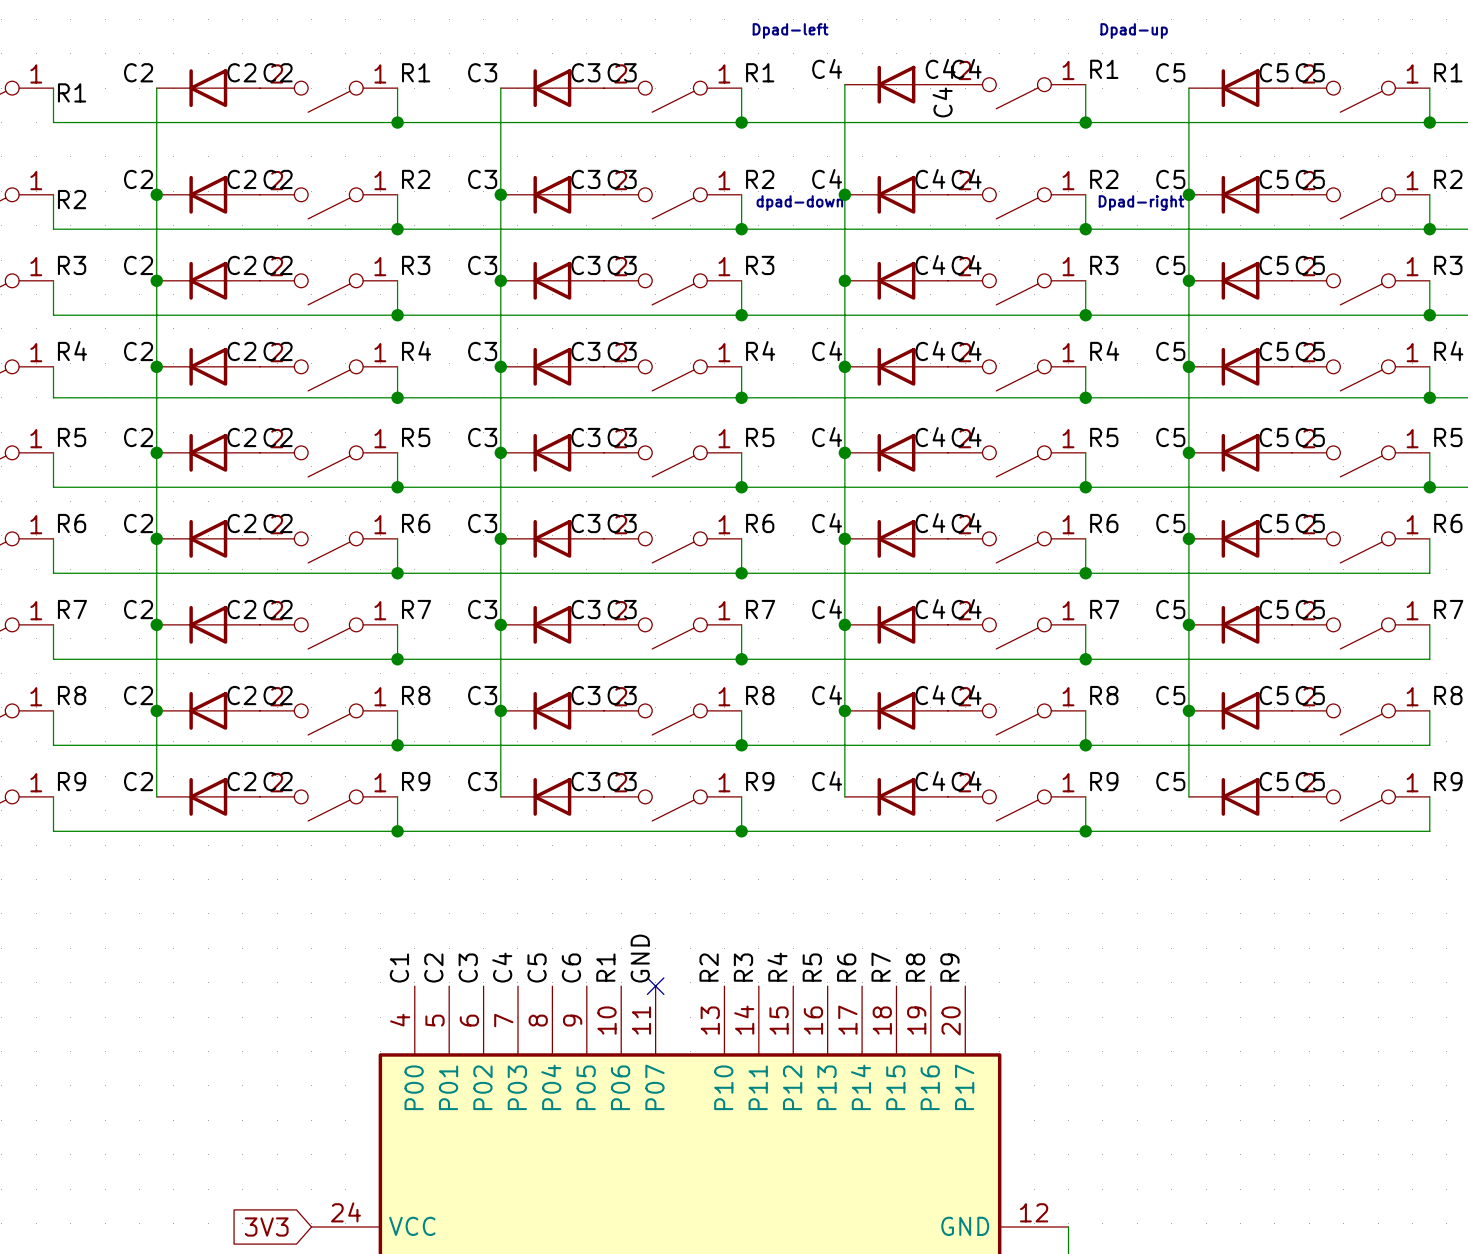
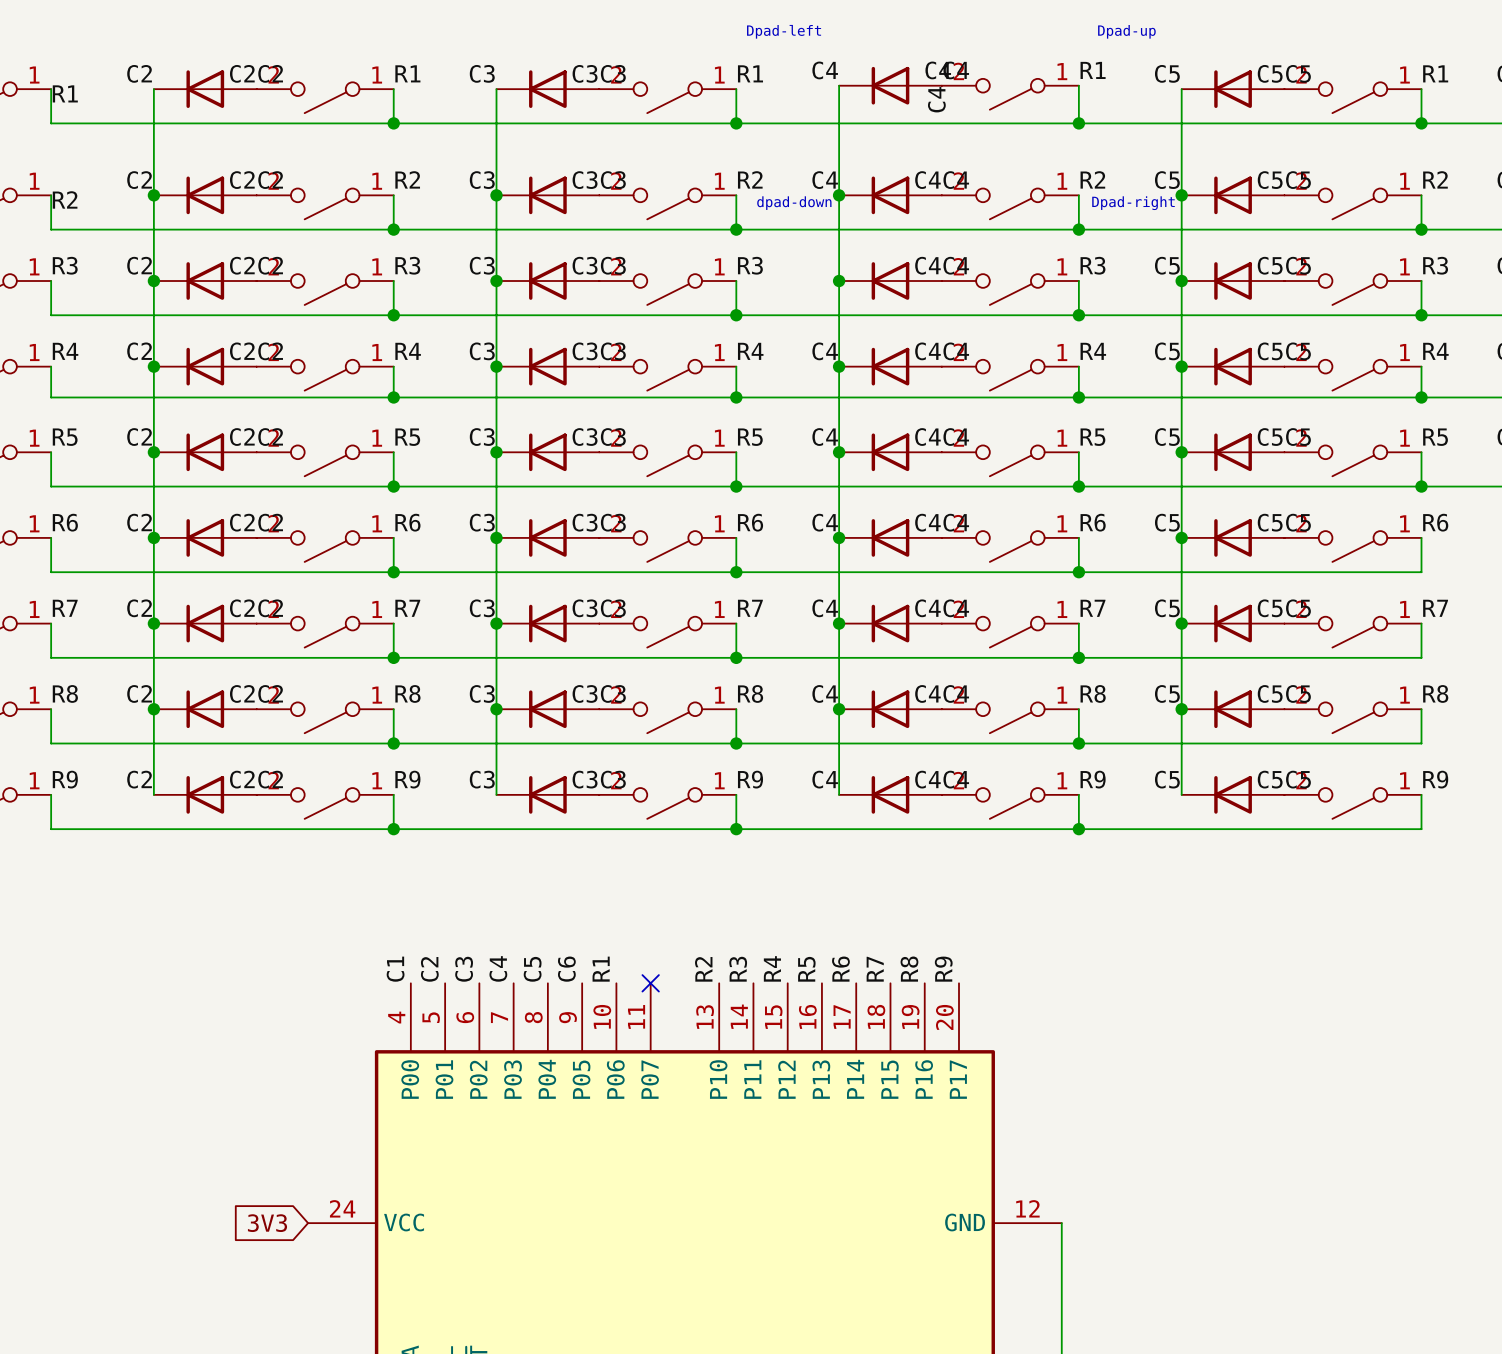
label: GND (640, 958) -> none

